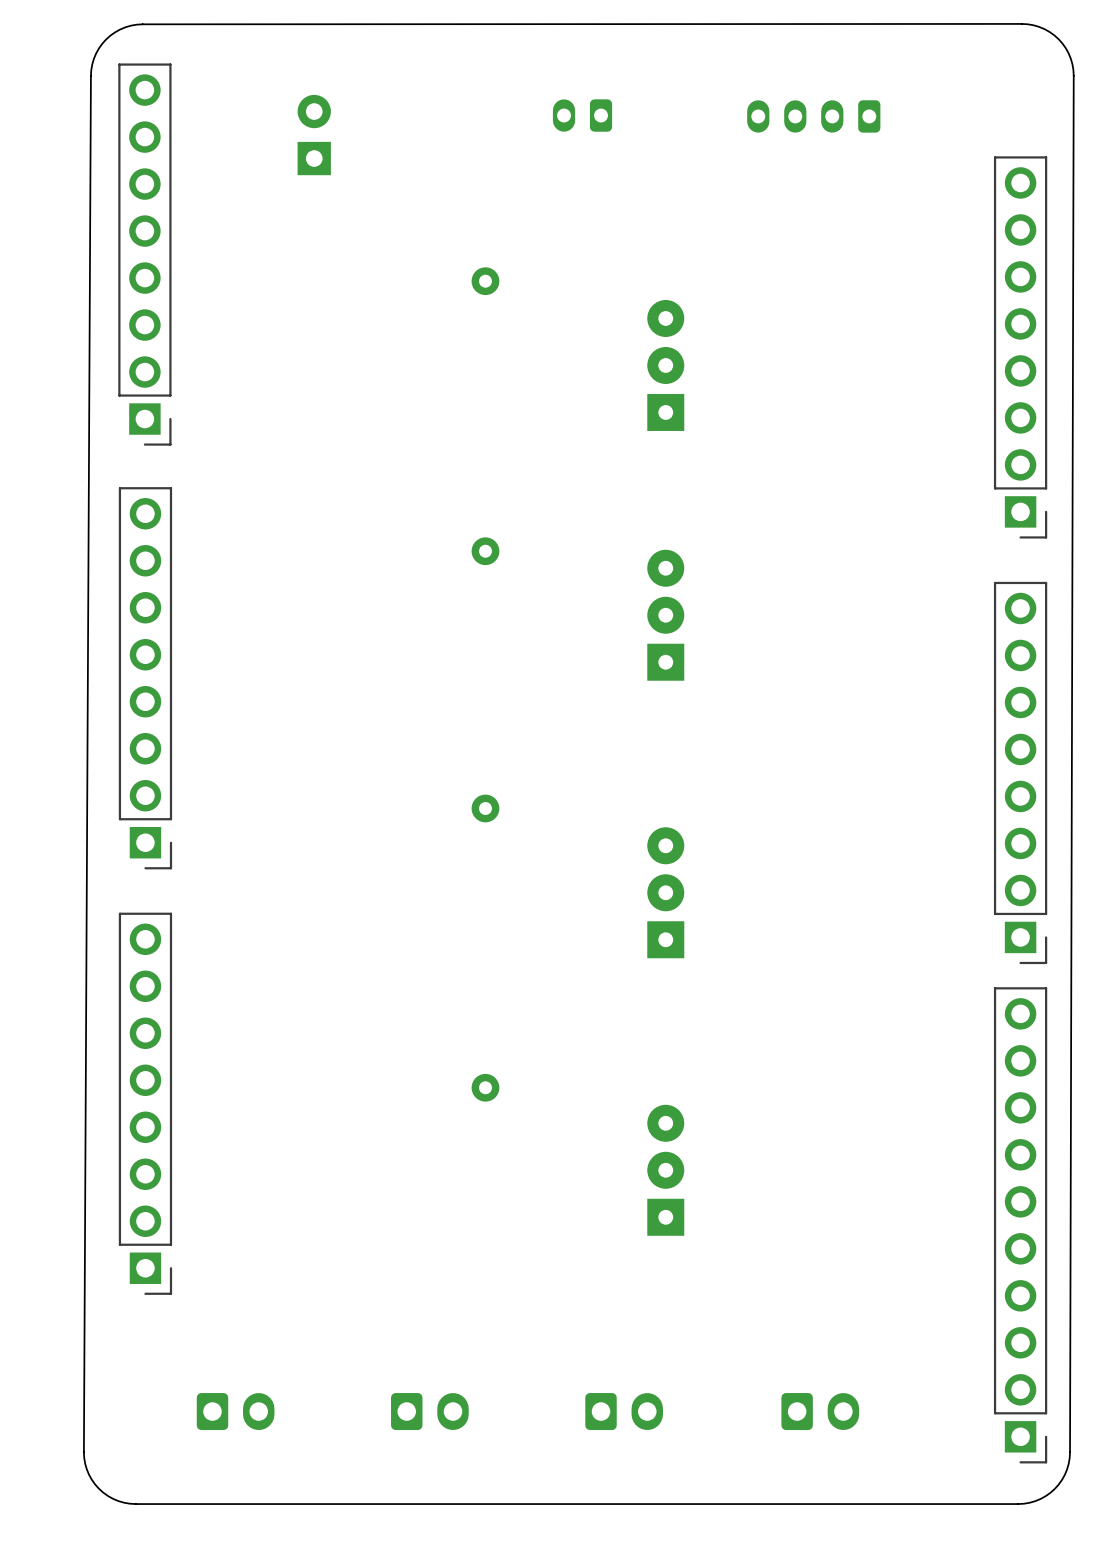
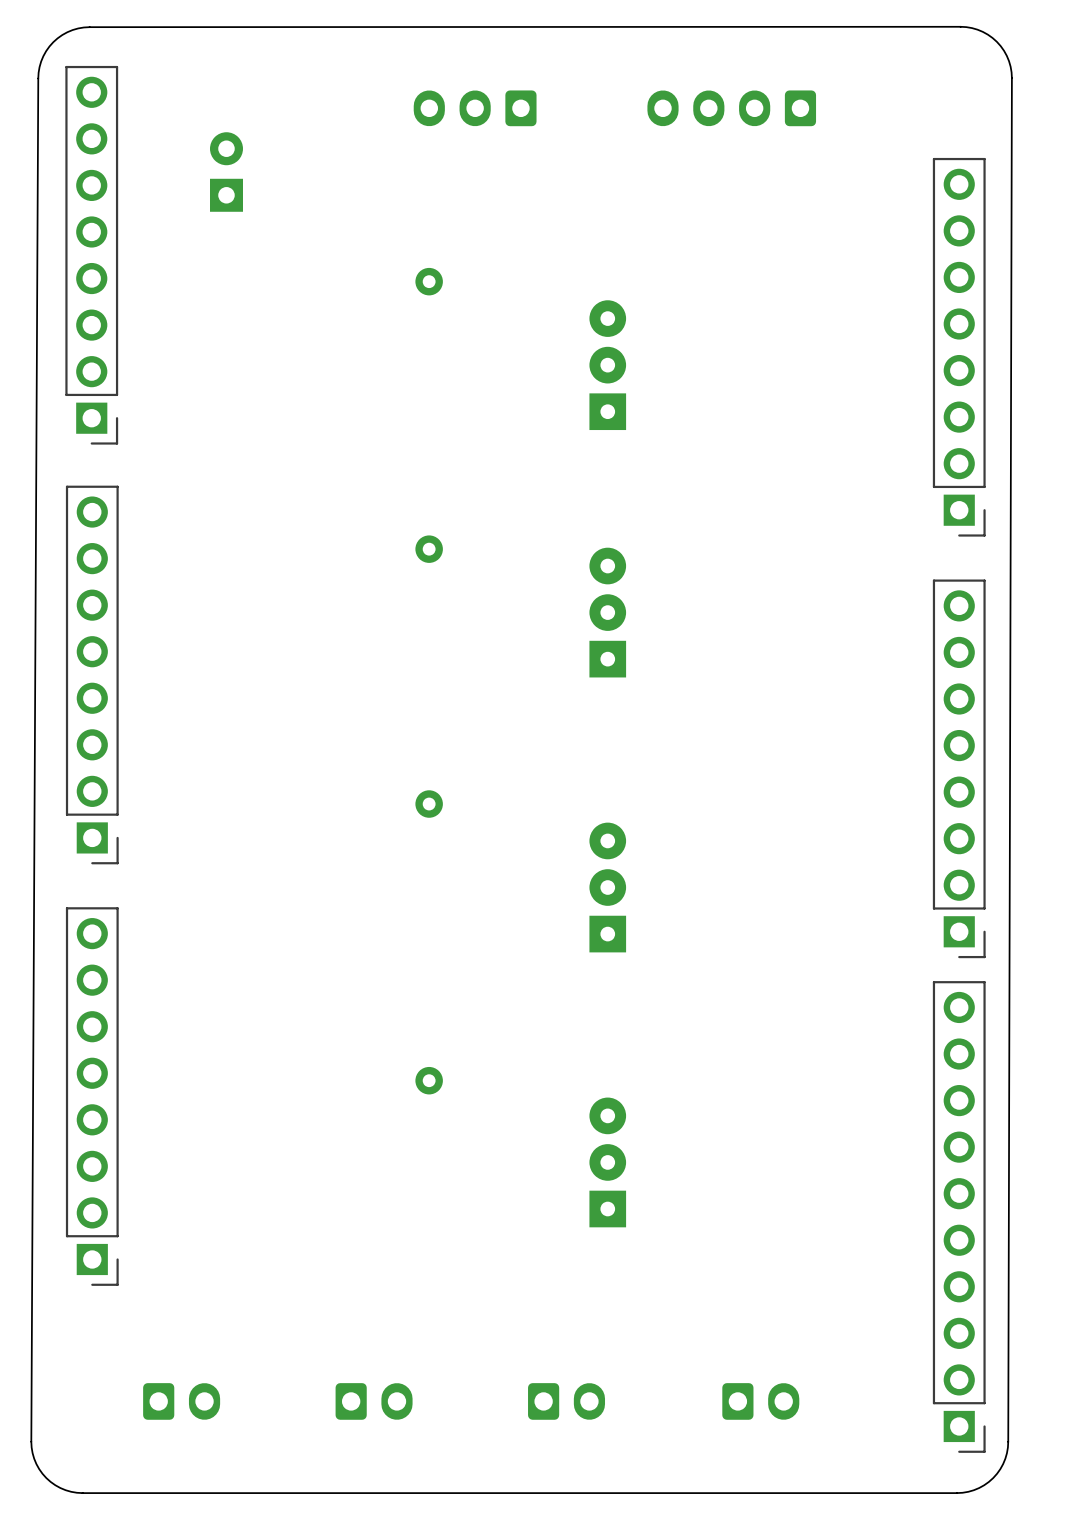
part: none -> (475, 108)
part: none -> (731, 108)
part: (582, 115) -> none
part: (813, 116) -> none
part position: (314, 135) -> (226, 172)

